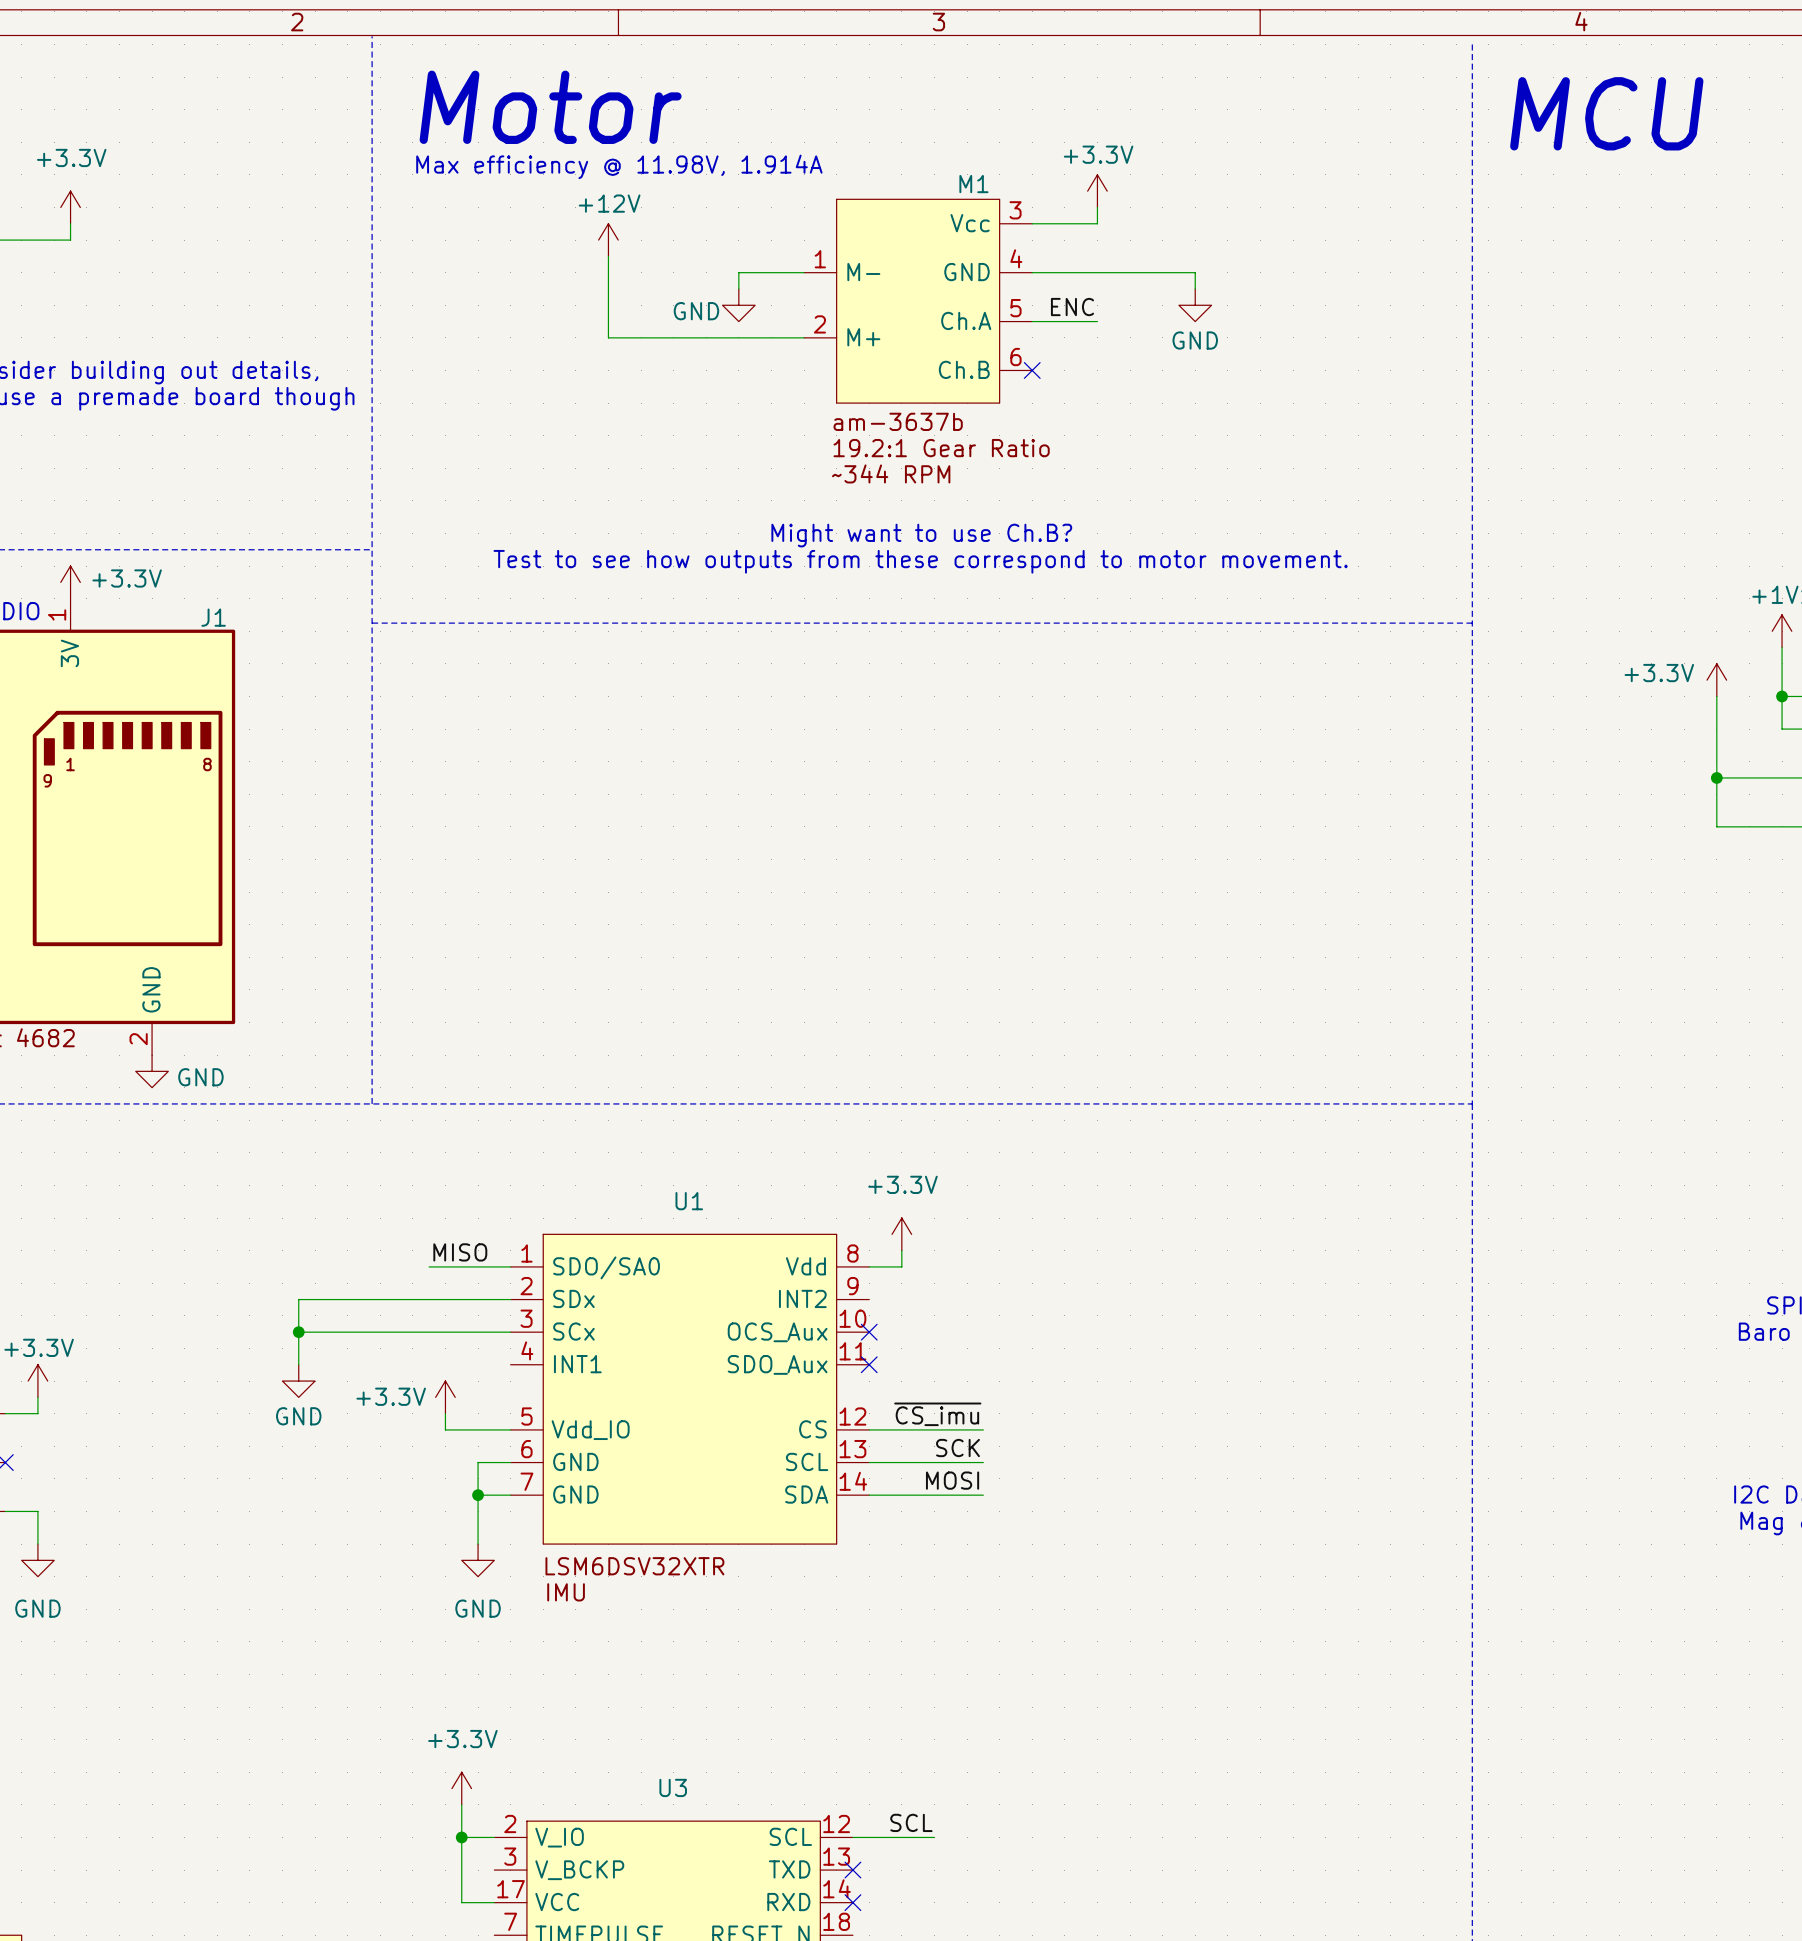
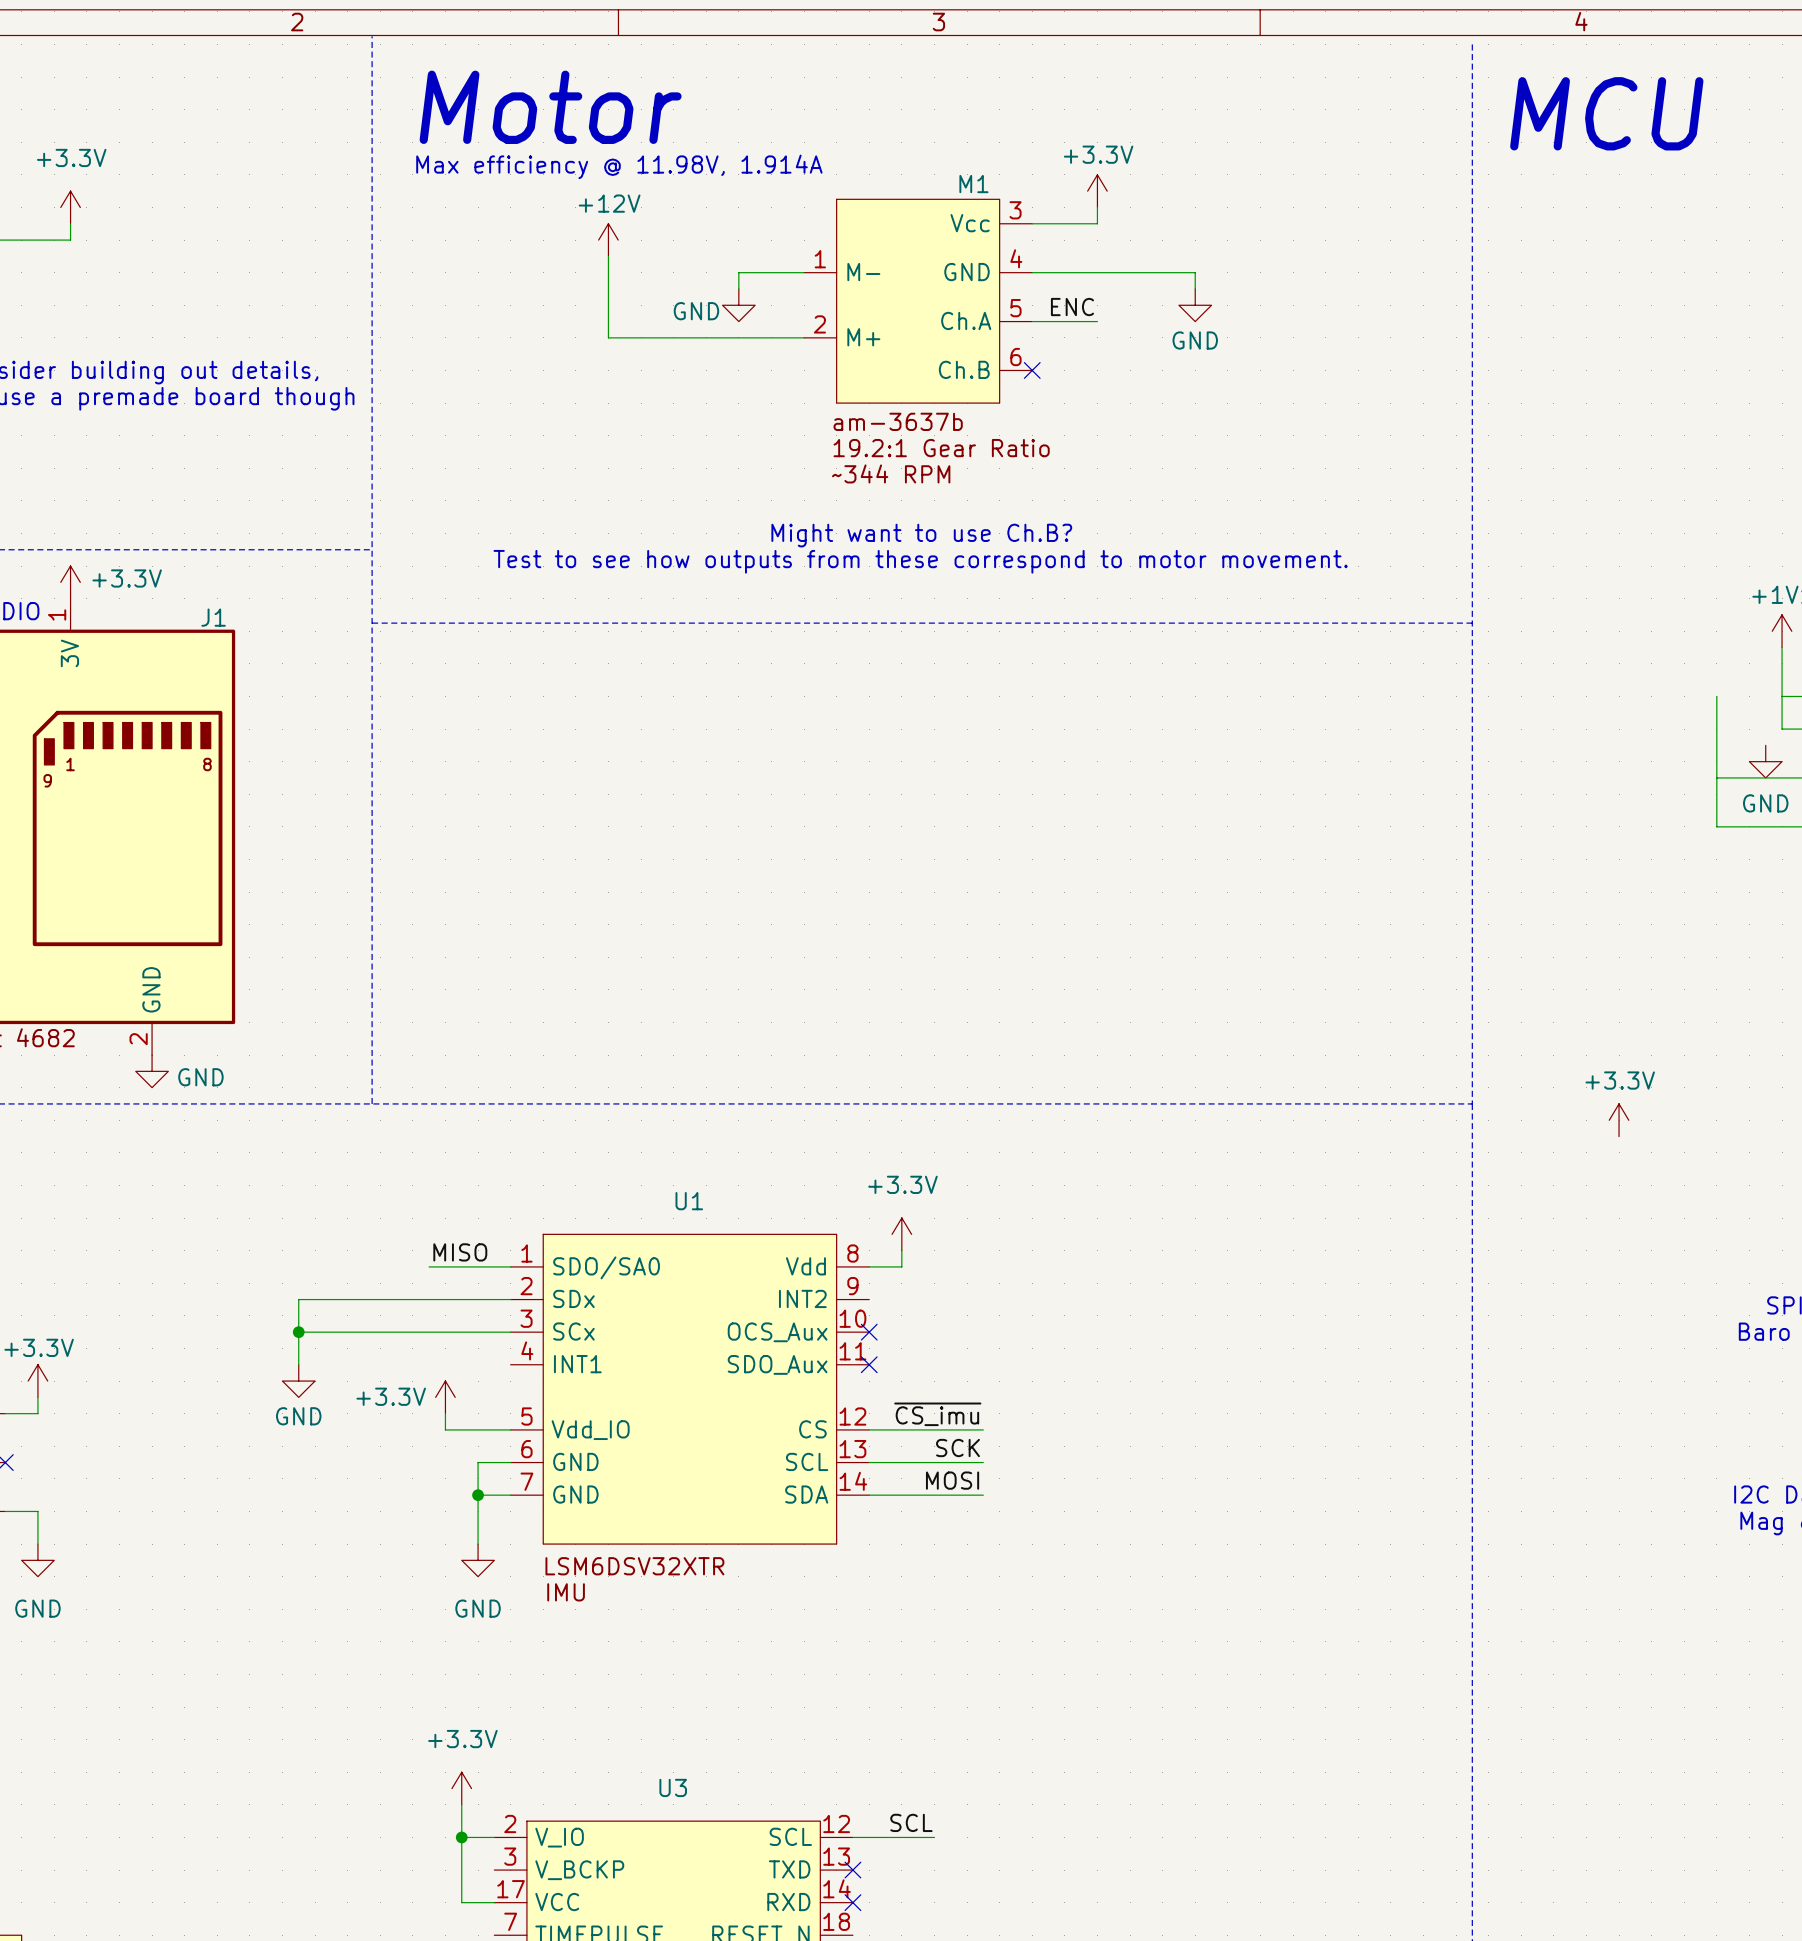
power symbol: +3.3V (1716, 680) -> none
junction: (1782, 696) -> none
power symbol: none -> GND (1765, 761)
junction: (1716, 777) -> none
power symbol: none -> +3.3V (1619, 1120)

